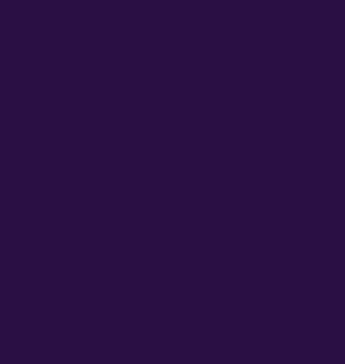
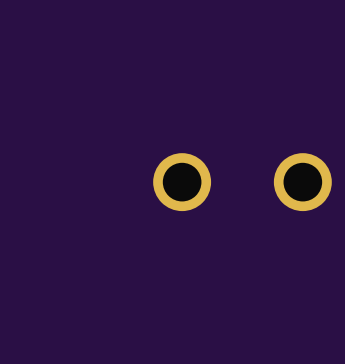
part: none -> (242, 182)

